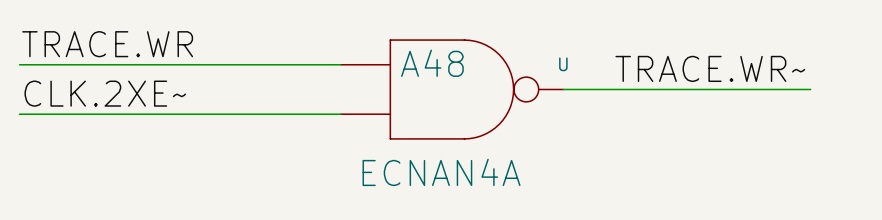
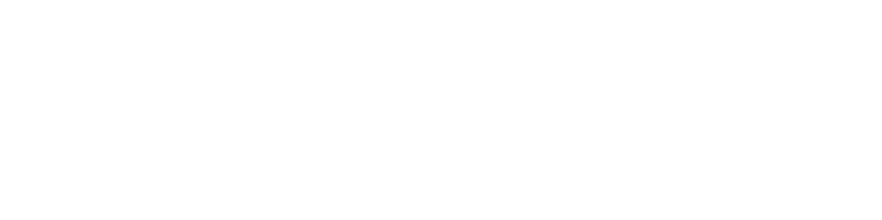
label: TRACE.WR (107, 44) -> none
wire: (19, 64) (340, 64) -> none
label: TRACE.WR~ (710, 68) -> none
U: (452, 89) -> none
wire: (563, 89) (810, 89) -> none
label: CLK.2XE~ (105, 93) -> none
wire: (19, 114) (340, 114) -> none

